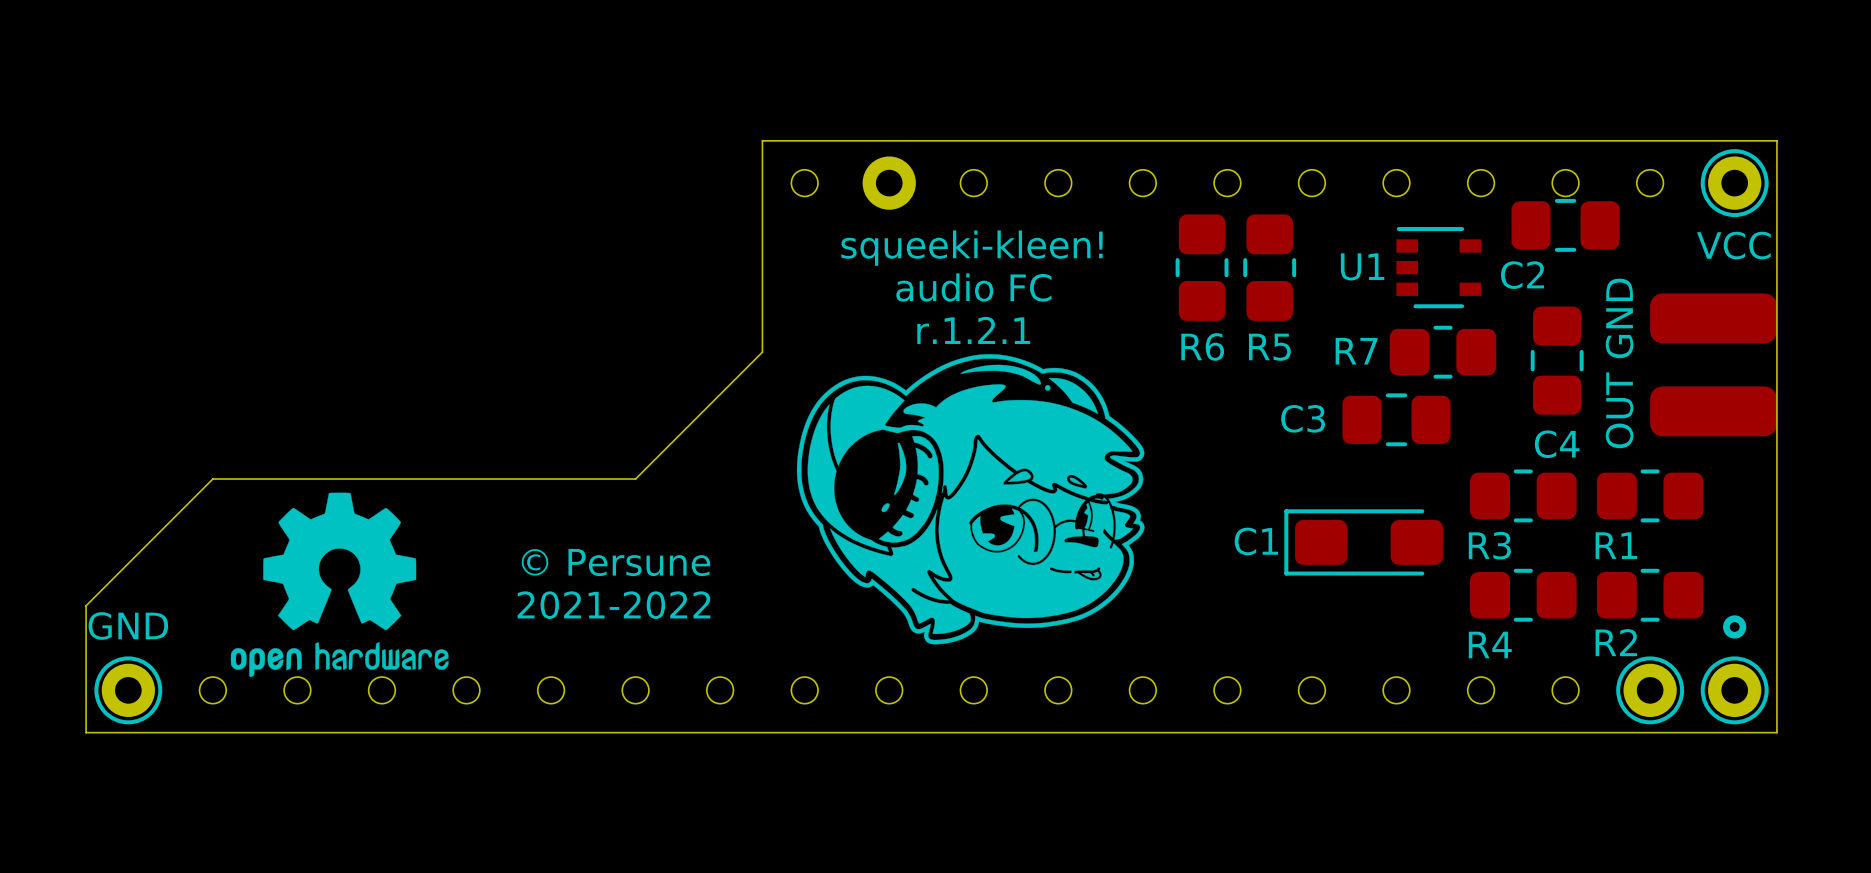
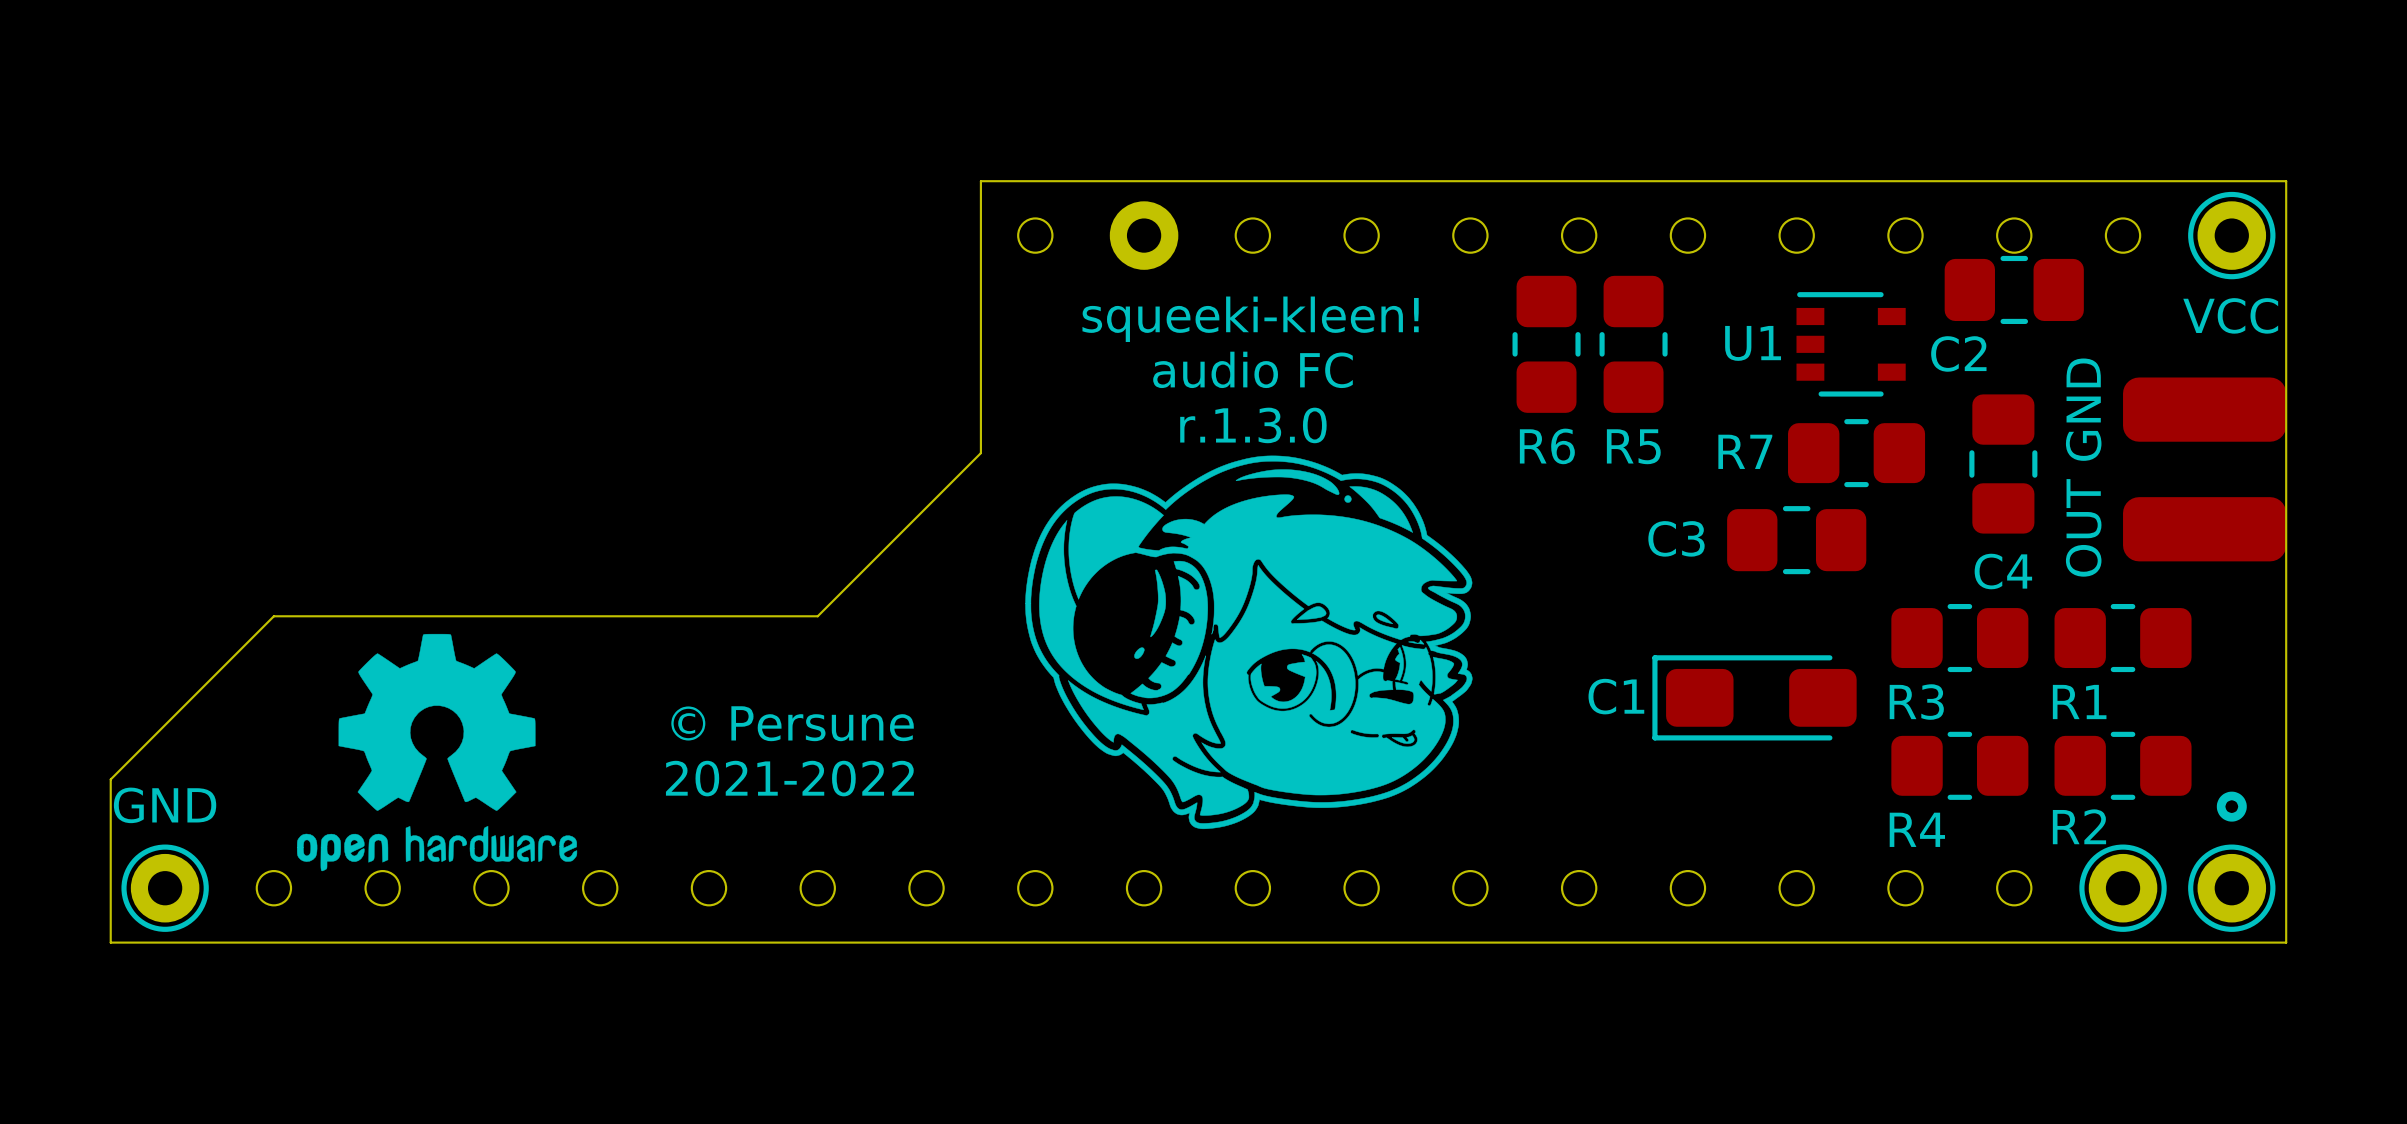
text: r.1.2.1 (973, 330) -> r.1.3.0 (1253, 425)

